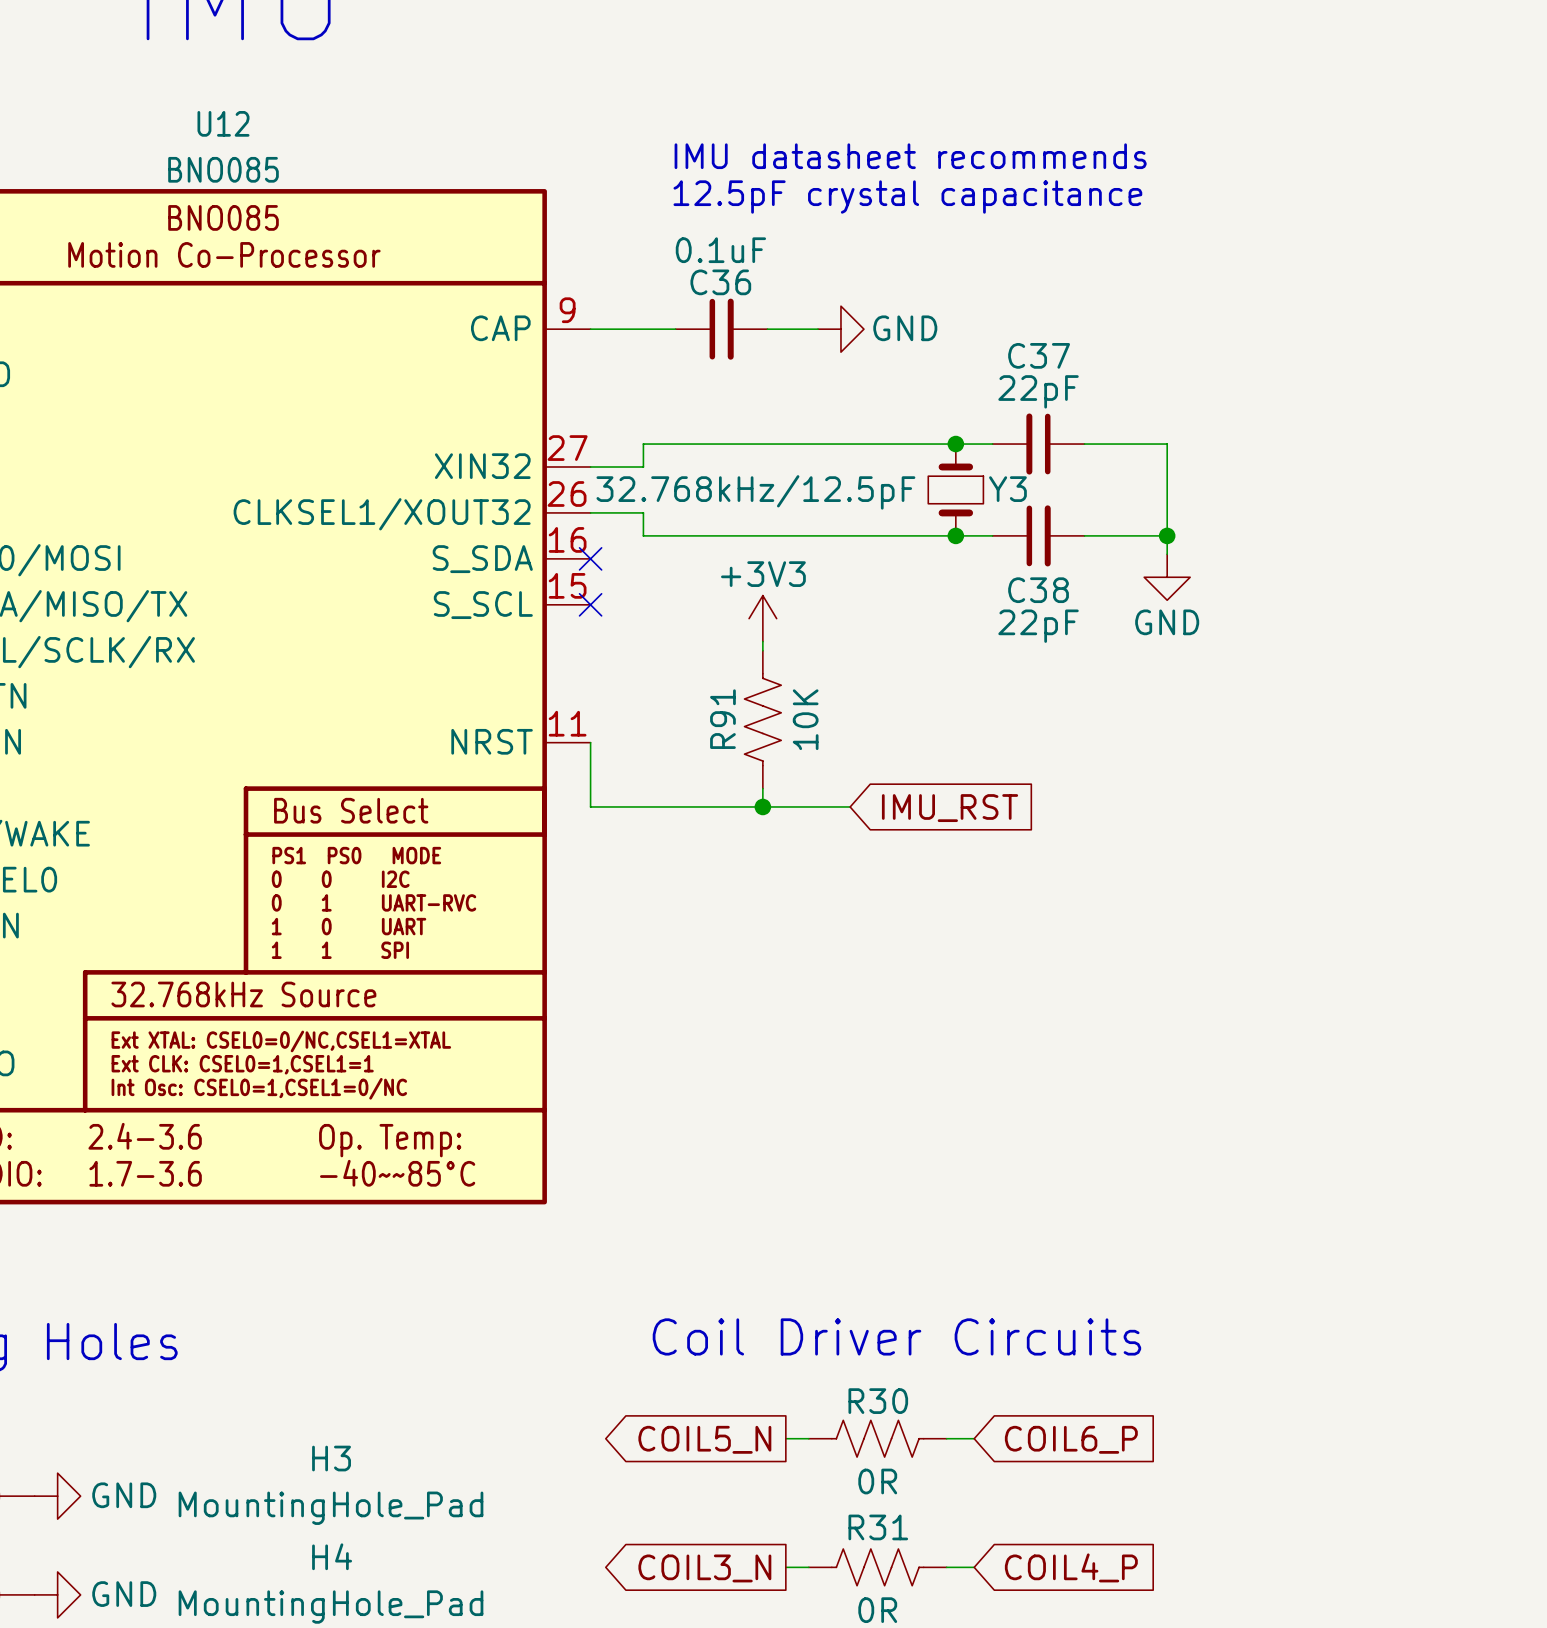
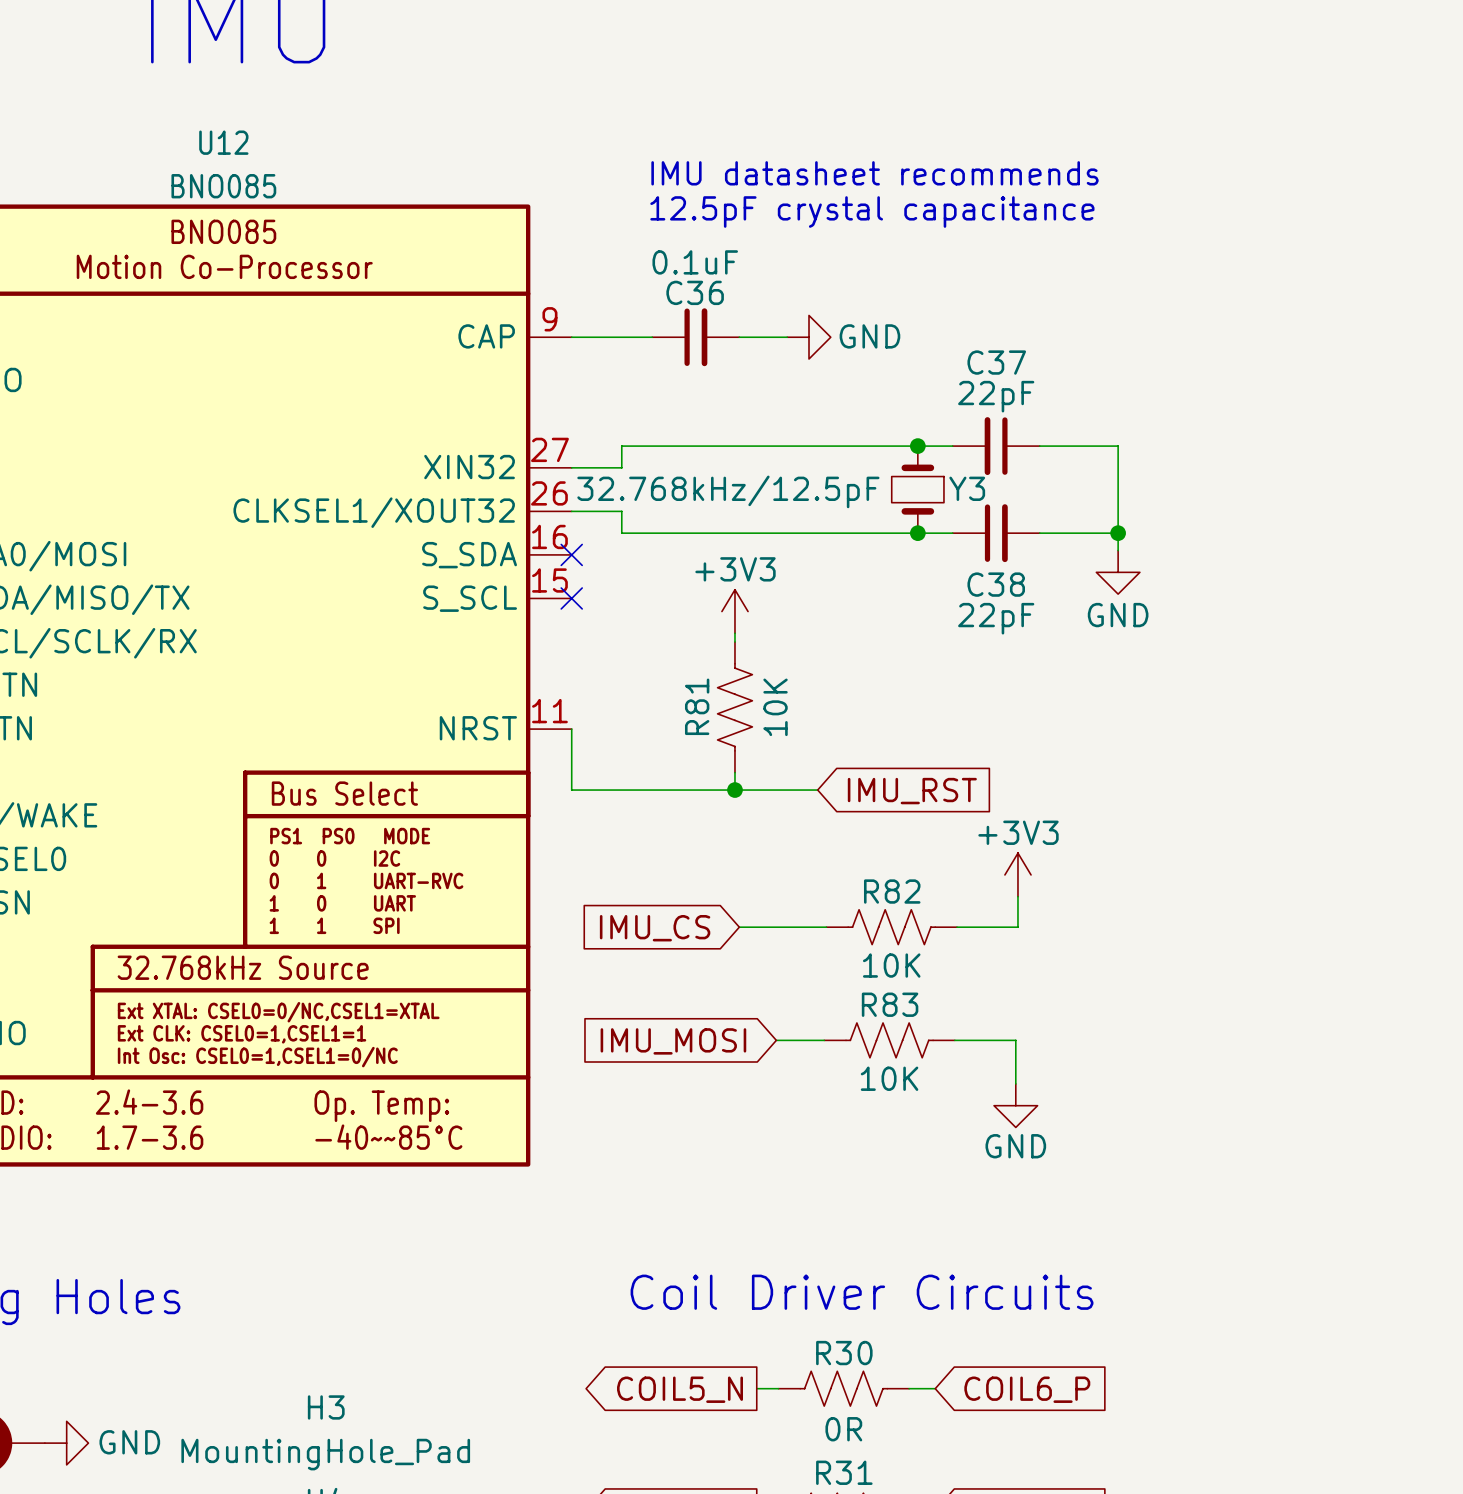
R91 name: R91 (722, 719) -> R81 (697, 706)
power symbol: none -> +3V3 (1017, 874)
wire: none -> (1017, 896) (1017, 927) (957, 927)
wire: none -> (739, 927) (826, 927)
R82: none -> 10K (891, 927)
global label: none -> IMU_CS (655, 928)
wire: none -> (776, 1040) (824, 1040)
R83: none -> 10K (889, 1040)
wire: none -> (954, 1040) (1015, 1040) (1015, 1083)
global label: none -> IMU_MOSI (673, 1041)
power symbol: none -> GND (1015, 1105)

